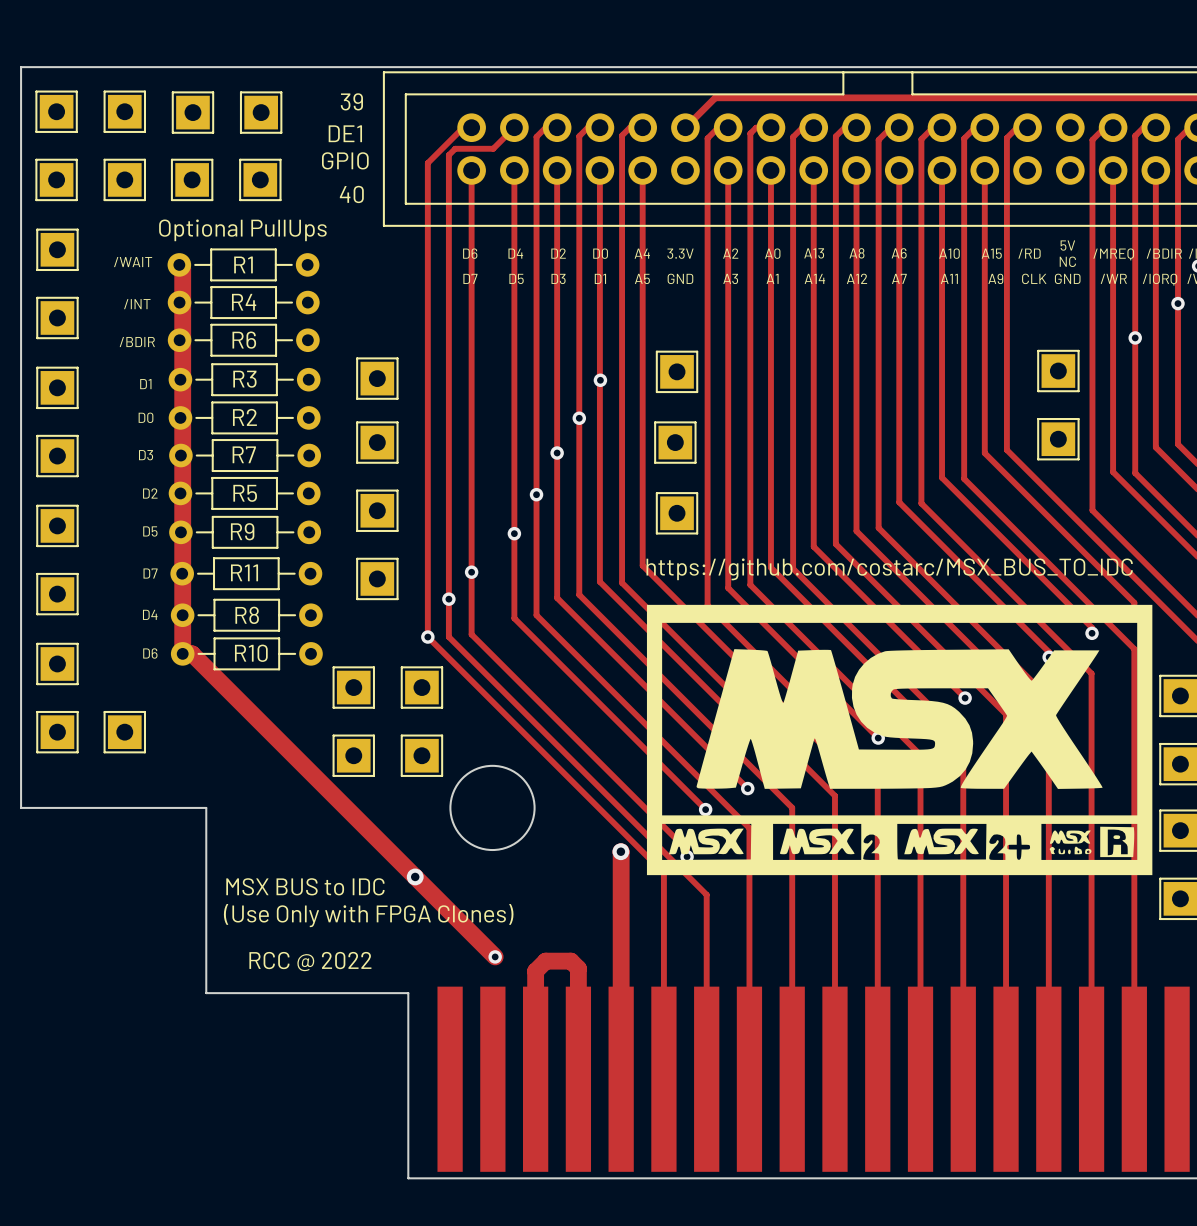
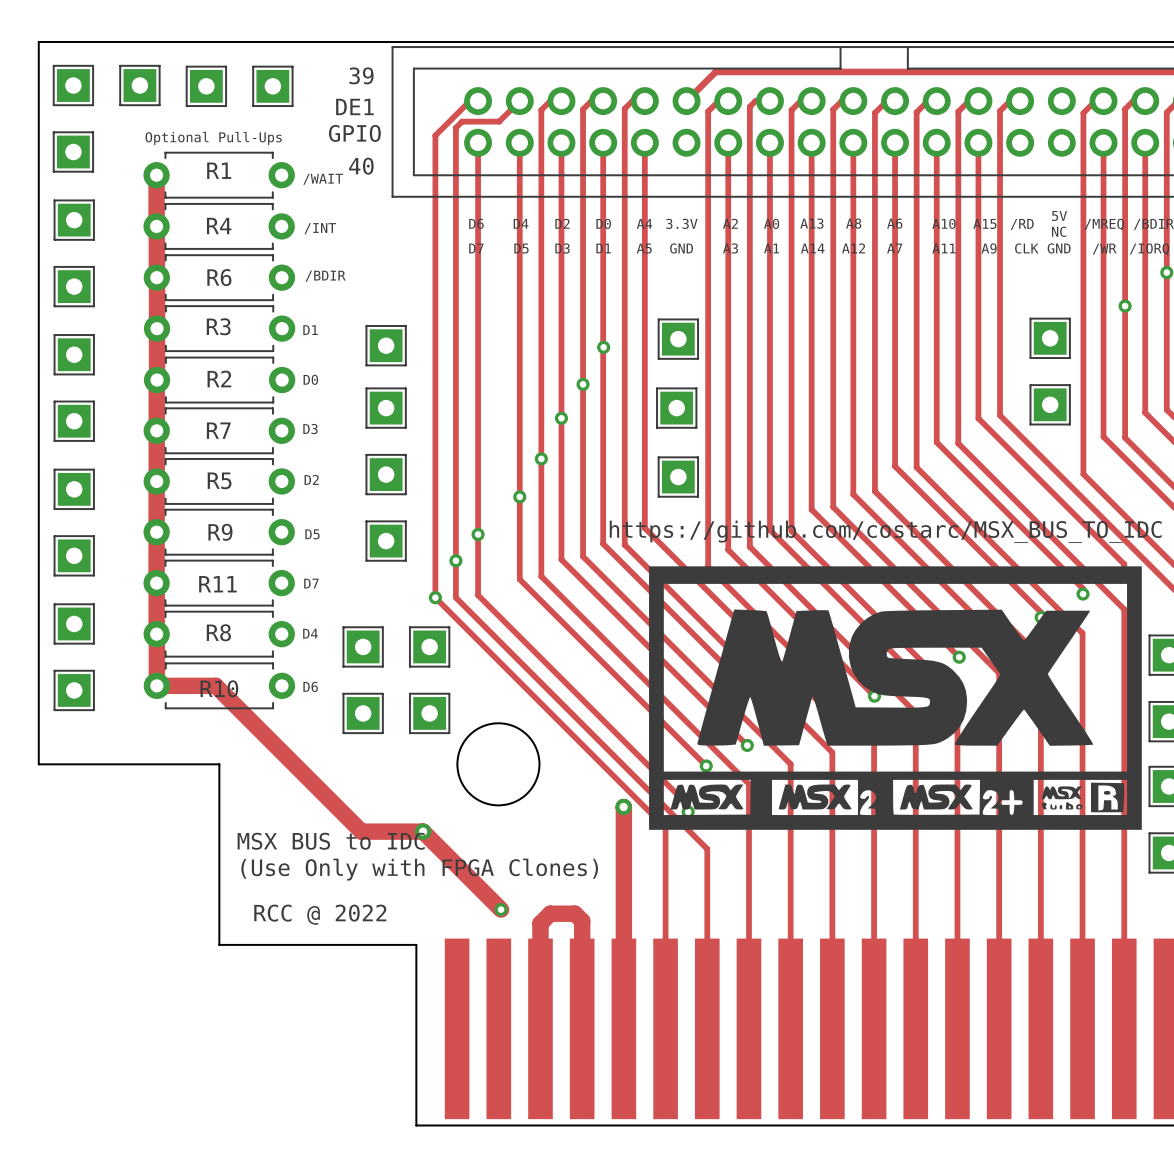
text: none -> Optional Pull-Ups (213, 138)
part: (124, 179) -> none
part: (192, 179) -> none
part: (260, 179) -> none
track: none -> (156, 175) (156, 277)
text: Optional PullUps (242, 230) -> none
R1 footprint: [167, 248, 320, 282] -> [143, 151, 295, 199]
text position: /WAIT (133, 262) -> /WAIT (323, 179)
track: (179, 264) (182, 268) (182, 653) (192, 653) (415, 876) -> (156, 634) (156, 685) (215, 685) (361, 831) (423, 831)
R4 footprint: [167, 286, 320, 320] -> [143, 202, 295, 250]
text position: /INT (137, 304) -> /INT (320, 228)
track: none -> (157, 277) (156, 481)
R6 footprint: [167, 323, 320, 357] -> [143, 254, 296, 302]
text position: /BDIR (137, 342) -> /BDIR (325, 276)
R3 footprint: [168, 363, 321, 397] -> [143, 305, 296, 353]
text position: D1 (145, 384) -> D1 (310, 330)
R2 footprint: [168, 401, 321, 435] -> [143, 356, 296, 404]
text position: D0 (146, 417) -> D0 (310, 379)
R7 footprint: [169, 439, 321, 473] -> [143, 407, 295, 455]
text position: D3 (146, 455) -> D3 (310, 429)
R5 footprint: [168, 476, 321, 510] -> [143, 457, 295, 505]
text position: D2 (150, 493) -> D2 (311, 479)
R9 footprint: [169, 515, 322, 549] -> [143, 508, 295, 556]
text position: D5 (150, 531) -> D5 (312, 534)
R11 footprint: [170, 557, 323, 591] -> [143, 559, 295, 607]
text position: D7 (150, 573) -> D7 (311, 583)
R8 footprint: [170, 598, 323, 632] -> [143, 610, 295, 658]
text position: D4 (150, 614) -> D4 (310, 633)
R10 footprint: [170, 637, 323, 671] -> [143, 662, 296, 710]
text position: D6 (150, 653) -> D6 (310, 686)
part: (124, 732) -> none

